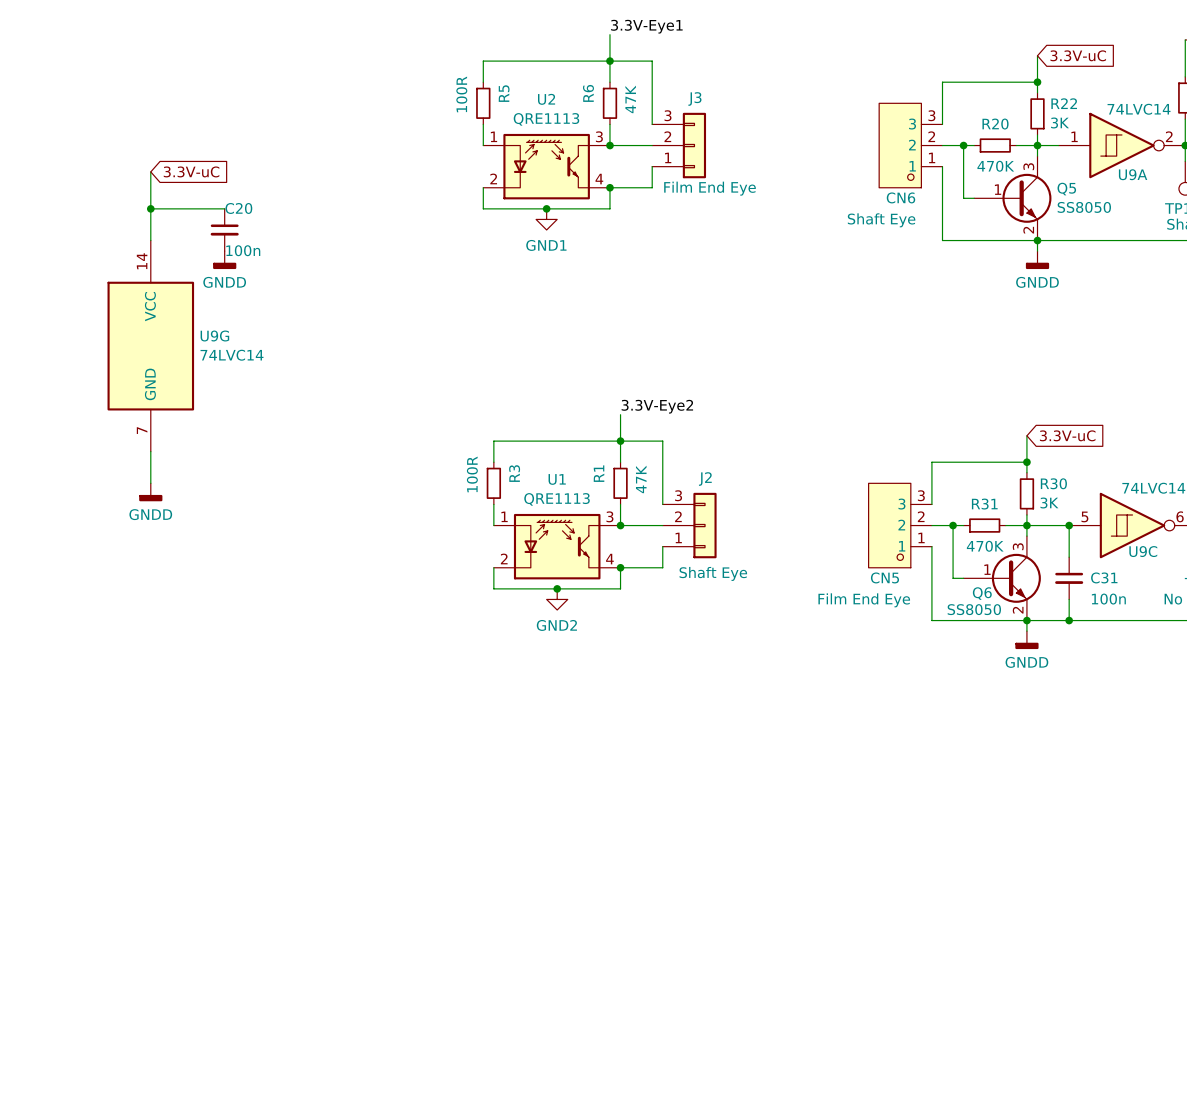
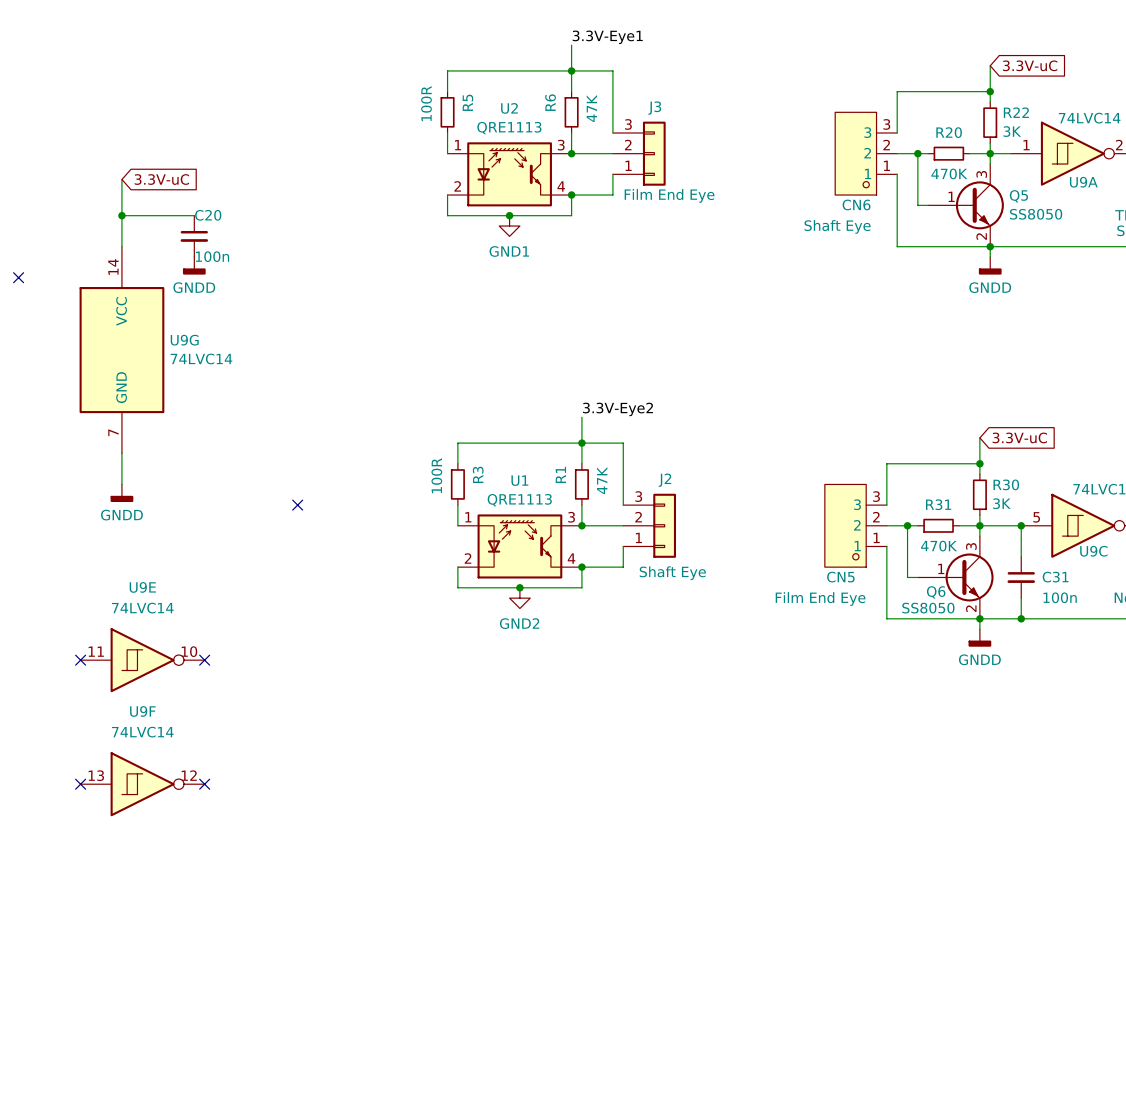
no-connect mark: none -> (18, 277)
no-connect mark: none -> (297, 505)
no-connect mark: none -> (80, 660)
U9E: none -> 74LVC14 (142, 660)
no-connect mark: none -> (204, 660)
no-connect mark: none -> (80, 784)
U9F: none -> 74LVC14 (142, 784)
no-connect mark: none -> (204, 784)

